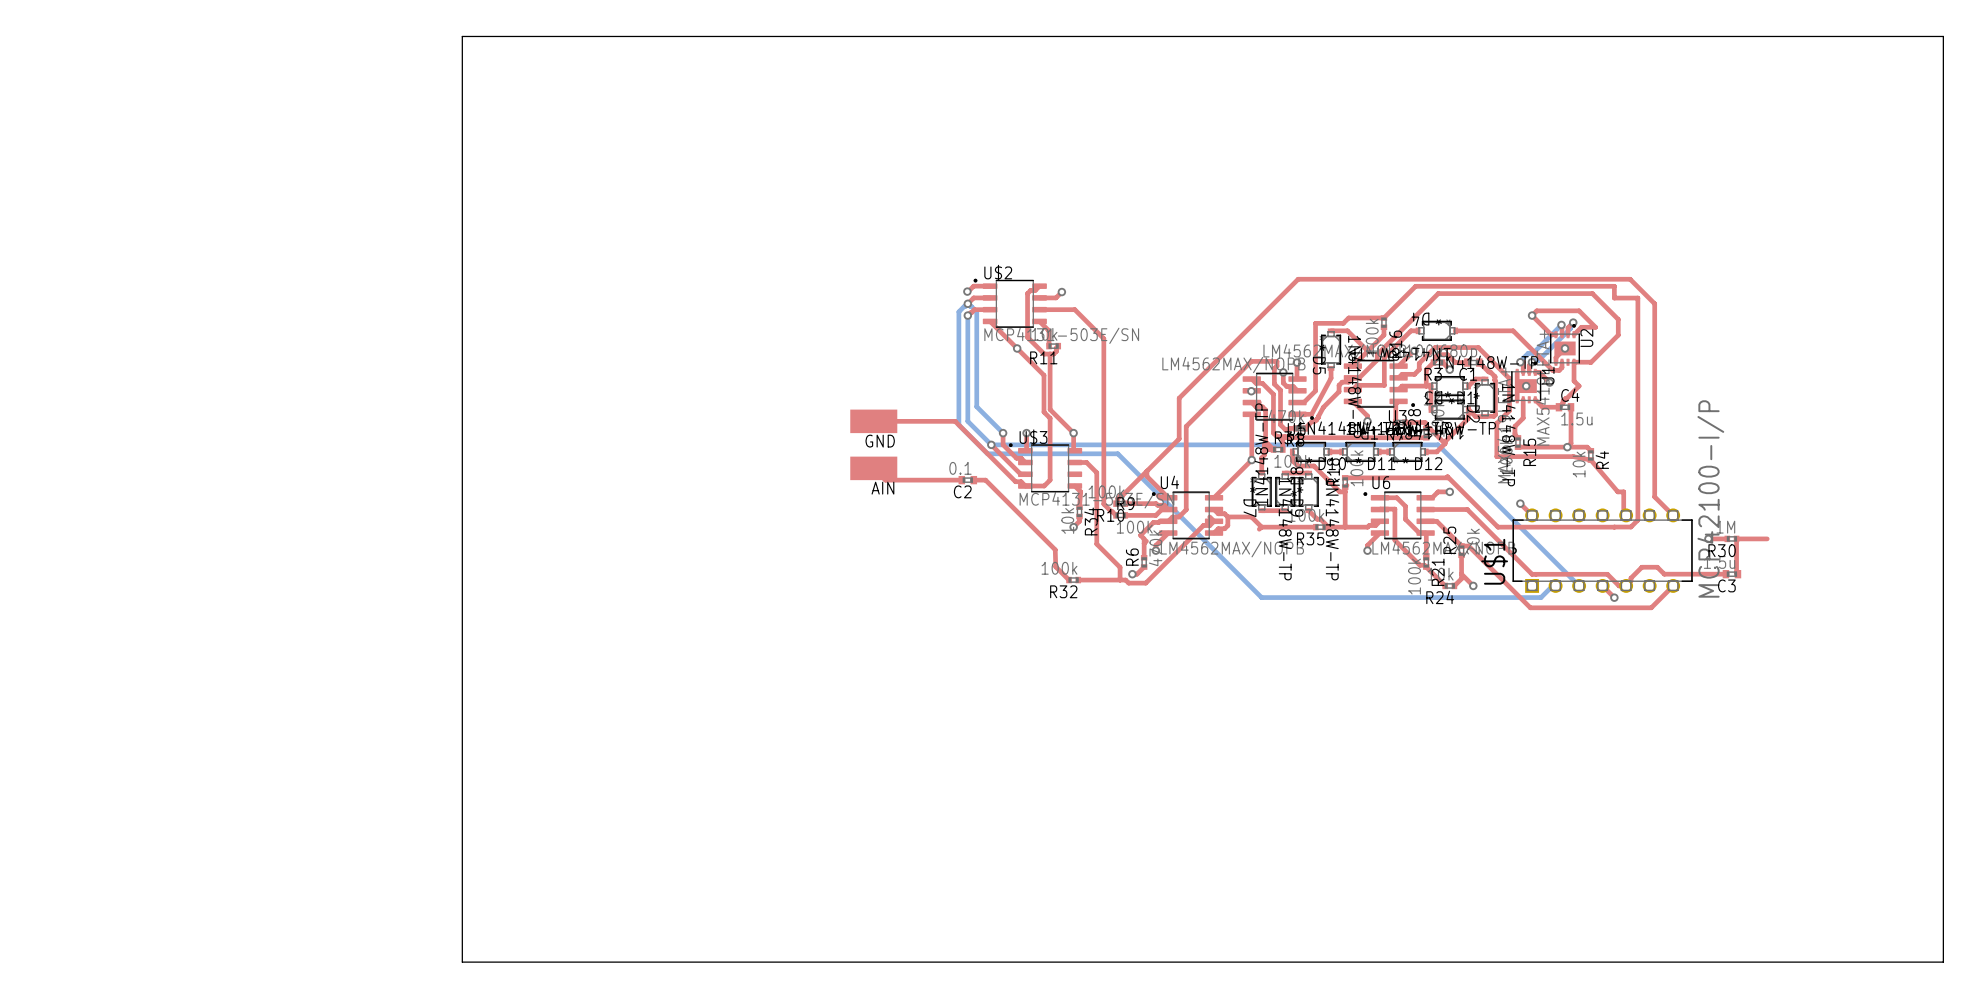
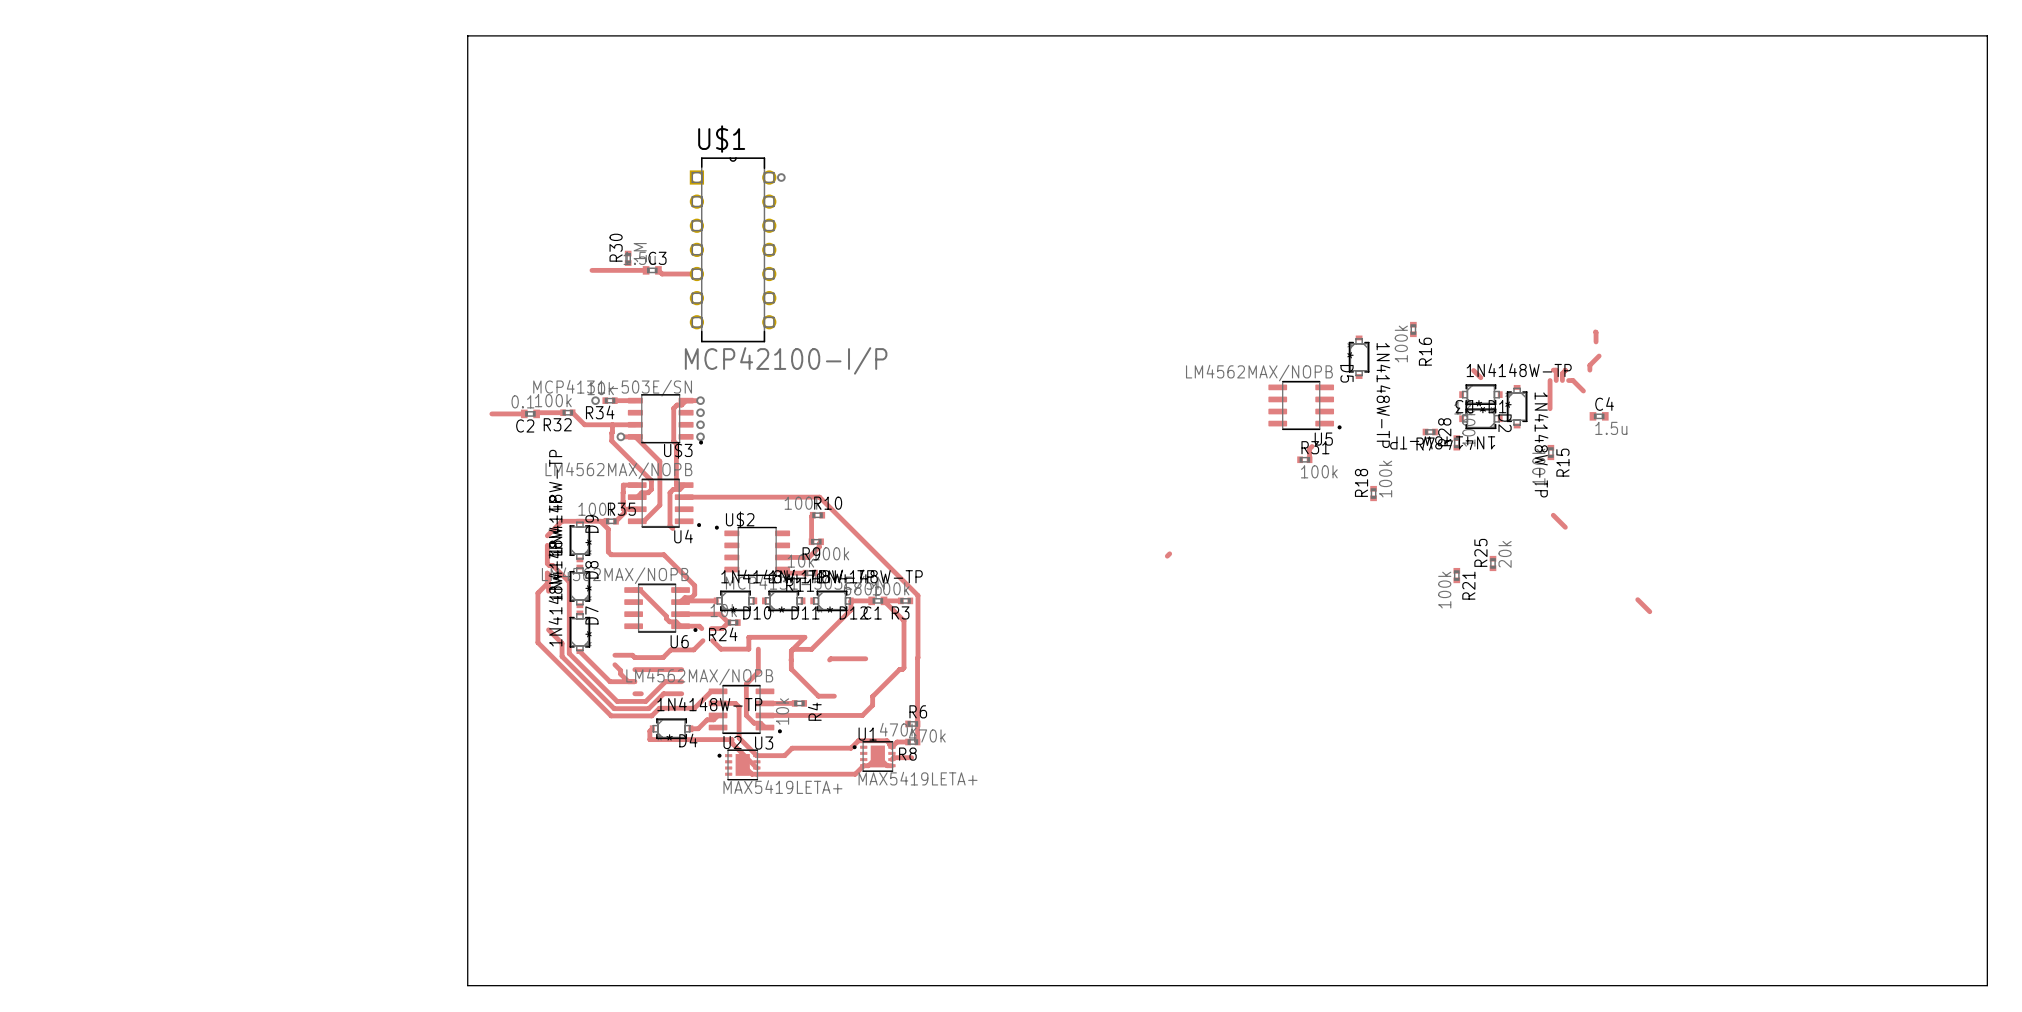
via: none -> (781, 177)
top track: none -> (591, 270) (646, 270)
top track: none -> (658, 270) (662, 274) (696, 274)
top track: (990, 286) (973, 286) (967, 291) -> none
top track: (1039, 286) (1027, 293) (1027, 337) (1044, 354) (1053, 354) (1058, 346) -> none
via: (967, 291) -> none
top track: (1061, 292) (1055, 297) (1039, 297) -> none
via: (1061, 292) -> none
top track: (990, 297) (973, 297) (967, 303) -> none
via: (967, 303) -> none
U$2 position: (1010, 303) -> (752, 550)
top track: (990, 309) (974, 309) (967, 315) -> none
top track: (1039, 309) (1074, 309) (1103, 338) (1103, 504) (1116, 515) -> none
bottom track: (967, 315) (967, 421) (991, 444) (1438, 444) (1579, 585) -> none
via: (967, 315) -> none
via: (1532, 315) -> none
top track: (990, 321) (1043, 375) (1043, 412) (1050, 418) (1050, 480) (1044, 486) (1025, 486) (1021, 481) (1015, 481) (955, 421) (873, 421) -> none
top track: (1039, 321) (1049, 330) (1049, 346) -> none
top track: (1572, 322) (1568, 327) (1568, 334) -> none
bottom track: (1573, 322) (1570, 328) (1538, 360) (1531, 362) -> none
via: (1573, 322) -> none
bottom track: (1561, 324) (1533, 353) (1528, 353) (1520, 362) -> none
via: (1561, 324) -> none
top track: (1383, 327) (1383, 335) (1352, 366) -> none
top track: (1331, 330) (1347, 330) (1367, 351) -> none
top track: (1418, 330) (1411, 330) (1384, 357) (1384, 385) (1357, 385) (1352, 389) -> none
D4 rotation: 0° (1436, 330) -> 180° (671, 728)
D4 position: (1436, 330) -> (671, 728)
top track: (1455, 330) (1513, 330) (1552, 370) (1559, 370) (1562, 367) (1562, 362) -> none
top track: (1555, 334) (1551, 334) (1532, 315) (1536, 310) (1579, 310) (1595, 327) (1581, 327) (1574, 334) -> none
U2 rotation: 0° (1565, 344) -> 90° counterclockwise (739, 764)
U2 position: (1565, 344) -> (739, 764)
R11 position: (1053, 346) -> (810, 573)
via: (1017, 348) -> none
via: (1565, 348) -> none
top track: (1414, 350) (1398, 366) -> none
via: (1414, 350) -> none
top track: (1050, 354) (1050, 409) (1073, 433) (1074, 450) -> none
top track: (1296, 362) (1297, 379) -> none
via: (1296, 362) -> none
R3 position: (1438, 362) -> (905, 600)
top track: (1467, 362) (1455, 362) (1447, 354) (1437, 354) (1435, 360) (1426, 369) (1426, 386) -> none
C1 position: (1473, 362) -> (877, 600)
top track: (1479, 362) (1495, 377) -> none
via: (1520, 362) -> none
via: (1531, 362) -> none
top track: (1331, 368) (1331, 378) (1311, 414) (1297, 414) -> none
via: (1449, 369) -> none
top track: (1283, 372) (1283, 382) (1286, 386) (1293, 386) (1297, 390) -> none
via: (1283, 372) -> none
top track: (1494, 376) (1495, 414) (1475, 416) (1468, 409) (1468, 418) (1445, 443) -> none
top track: (1398, 377) (1402, 374) (1414, 374) (1419, 369) (1419, 363) (1435, 347) (1478, 347) (1509, 378) (1509, 410) (1496, 423) (1496, 456) (1573, 456) (1590, 460) (1617, 491) (1623, 491) (1623, 512) (1626, 515) -> none
top track: (1251, 379) (1256, 383) (1262, 383) (1273, 394) (1273, 433) (1276, 436) (1426, 437) -> none
top track: (1485, 379) (1475, 379) (1468, 386) -> none
U1 rotation: 0° (1526, 382) -> 90° counterclockwise (874, 756)
U1 position: (1526, 382) -> (874, 756)
via: (1549, 382) -> none
U3 position: (1379, 383) -> (745, 709)
via: (1526, 386) -> none
top track: (1398, 389) (1402, 386) (1430, 386) (1430, 409) -> none
via: none -> (595, 400)
top track: none -> (614, 400) (635, 400)
top track: none -> (700, 400) (686, 400) (673, 408) (676, 485) (684, 485) (679, 489) (673, 489) (669, 492) (669, 525) (672, 528)
via: none -> (700, 400)
via: (1251, 391) -> none
top track: (1523, 399) (1523, 418) (1514, 426) (1514, 434) (1517, 437) -> none
top track: (1535, 399) (1542, 407) (1558, 407) (1579, 386) (1574, 381) (1574, 362) (1590, 362) (1618, 335) (1618, 319) (1592, 293) (1438, 293) (1377, 354) (1377, 359) (1359, 377) (1352, 377) (1348, 382) (1342, 382) (1339, 385) (1339, 391) (1323, 407) (1316, 420) (1311, 421) (1305, 428) -> none
top track: (1352, 401) (1367, 416) (1367, 421) -> none
top track: (1398, 401) (1395, 404) (1395, 422) -> none
top track: (1259, 402) (1251, 402) (1256, 406) (1262, 406) (1265, 409) (1265, 441) (1273, 449) (1269, 449) (1264, 444) (1261, 473) -> none
top track: (1297, 402) (1303, 402) (1315, 390) (1315, 323) (1343, 323) (1348, 317) (1383, 317) (1415, 286) (1614, 286) (1614, 298) (1637, 298) (1637, 520) (1630, 527) (1614, 527) -> none
top track: none -> (563, 412) (536, 413)
top track: none -> (572, 412) (584, 424) (635, 424)
via: none -> (700, 412)
top track: none -> (491, 413) (524, 413)
top track: (1571, 407) (1571, 443) (1567, 447) -> none
top track: (1251, 414) (1251, 460) (1214, 497) -> none
top track: none -> (612, 424) (611, 440) (651, 480) (651, 489) (648, 492) (641, 492) (637, 497)
via: none -> (700, 424)
GND: (873, 421) -> none
via: (1367, 421) -> none
top track: (1405, 422) (1425, 422) (1426, 428) (1429, 428) (1445, 443) -> none
top track: none -> (620, 436) (635, 436) (659, 461) (659, 505) (643, 521) (637, 521)
via: none -> (620, 436)
via: none -> (700, 436)
top track: (1295, 428) (1285, 429) (1280, 424) (1280, 390) (1274, 384) (1274, 368) (1276, 366) (1276, 361) (1251, 361) (1186, 426) (1186, 509) (1178, 517) (1172, 517) (1168, 521) (1153, 522) (1140, 535) (1144, 538) (1144, 557) -> none
R8 position: (1300, 428) -> (912, 742)
top track: (1003, 433) (1003, 444) (1016, 458) (1021, 458) (1025, 462) -> none
bottom track: (1003, 433) (976, 406) (976, 311) (967, 303) (958, 311) (958, 425) (987, 453) (1117, 453) (1261, 597) (1540, 597) (1552, 585) (1555, 585) -> none
via: (1003, 433) -> none
top track: (1026, 433) (1025, 450) -> none
via: (1026, 433) -> none
via: (1073, 433) -> none
top track: (1445, 443) (1436, 451) (1426, 451) -> none
top track: (991, 444) (1020, 474) (1025, 474) -> none
via: (991, 444) -> none
top track: (1517, 447) (1587, 447) (1590, 450) -> none
via: (1567, 447) -> none
top track: (1292, 451) (1292, 460) (1297, 466) (1313, 466) (1339, 491) (1345, 491) -> none
D10 position: (1311, 451) -> (735, 600)
top track: (1329, 451) (1341, 451) -> none
D11 position: (1360, 451) -> (783, 600)
top track: (1379, 451) (1388, 451) -> none
D12 position: (1407, 451) -> (831, 600)
R4 rotation: 0° (1590, 455) -> 90° clockwise (799, 703)
R4 position: (1590, 455) -> (799, 703)
via: (1251, 460) -> none
top track: (1074, 462) (1086, 462) (1096, 472) (1096, 544) (1120, 567) (1120, 580) -> none
U$3 rotation: 0° (1045, 467) -> 180° (665, 419)
U$3 position: (1045, 467) -> (665, 419)
top track: (873, 468) (885, 480) (961, 480) -> none
AIN: (873, 468) -> none
top track: (1146, 471) (1146, 476) (1168, 497) (1160, 497) (1158, 495) -> none
top track: (1285, 473) (1308, 473) -> none
top track: none -> (637, 485) (623, 485) (623, 492) (623, 509) (637, 509)
top track: (1345, 477) (1447, 476) (1498, 527) (1614, 527) -> none
C2 position: (967, 480) -> (530, 413)
top track: (973, 480) (985, 480) (1055, 549) (1055, 566) (1068, 580) -> none
top track: (1346, 485) (1345, 487) (1345, 527) -> none
top track: none -> (684, 497) (819, 497) (917, 595) (917, 742)
top track: (1074, 486) (1080, 491) (1079, 507) -> none
D7 rotation: 0° (1261, 491) -> 180° (579, 632)
D7 position: (1261, 491) -> (579, 632)
D8 position: (1285, 491) -> (579, 586)
D9 rotation: 0° (1308, 491) -> 180° (579, 540)
D9 position: (1308, 491) -> (579, 540)
top track: (1449, 491) (1438, 491) (1432, 497) (1425, 497) -> none
via: (1449, 491) -> none
top track: none -> (624, 509) (624, 512) (616, 521)
top track: (1379, 497) (1396, 497) (1405, 506) (1405, 519) (1419, 533) (1426, 533) (1426, 557) -> none
top track: none -> (812, 515) (811, 541)
top track: (1116, 503) (1117, 498) (1179, 438) (1179, 398) (1298, 279) (1630, 279) (1654, 303) (1654, 496) (1673, 515) -> none
R10 position: (1120, 503) -> (817, 515)
top track: (1125, 503) (1156, 503) (1164, 505) (1168, 509) -> none
R9 name position: R9 (1125, 503) -> R9 (811, 553)
via: (1520, 503) -> none
top track: (1165, 506) (1155, 515) (1125, 515) -> none
top track: none -> (600, 521) (608, 529) (608, 551) (611, 554) (663, 554) (694, 585) (694, 594) (691, 597) (684, 597) (680, 602)
top track: none -> (606, 521) (561, 521) (547, 535)
top track: (1214, 509) (1218, 513) (1224, 513) (1227, 516) -> none
top track: (1379, 509) (1394, 509) (1394, 540) (1419, 565) (1424, 565) (1445, 585) -> none
top track: (1425, 509) (1467, 509) (1532, 574) (1607, 574) (1619, 585) (1626, 585) (1641, 567) (1657, 567) (1664, 574) (1725, 574) -> none
top track: (1261, 510) (1285, 510) -> none
top track: (1308, 510) (1328, 527) -> none
R34 rotation: 0° (1079, 511) -> 90° clockwise (610, 400)
R34 position: (1079, 511) -> (610, 400)
R10 name position: R10 (1110, 515) -> R10 (828, 503)
R9 position: (1120, 515) -> (816, 541)
U4 rotation: 0° (1187, 515) -> 180° (664, 503)
U4 position: (1187, 515) -> (664, 503)
U6 rotation: 0° (1399, 515) -> 180° (660, 608)
U6 position: (1399, 515) -> (660, 608)
top track: (1079, 516) (1079, 521) (1073, 527) -> none
top track: (1227, 516) (1251, 516) (1261, 527) -> none
top track: (1227, 516) (1227, 525) (1224, 528) (1218, 528) (1214, 533) -> none
top track: (1209, 517) (1214, 521) (1209, 525) (1203, 525) (1145, 583) (1128, 583) (1125, 580) (1078, 580) -> none
top track: (1379, 521) (1375, 525) (1367, 527) (1325, 527) -> none
top track: (1425, 521) (1436, 521) (1461, 546) (1468, 546) (1530, 607) (1651, 607) (1673, 585) -> none
via: (1073, 527) -> none
top track: (1315, 527) (1261, 527) (1259, 529) -> none
R35 position: (1320, 527) -> (611, 521)
top track: none -> (821, 541) (819, 547) (808, 557) (782, 557)
top track: none -> (547, 545) (547, 563) (552, 565) (569, 582) (569, 653) (617, 701) (645, 701) (665, 681) (681, 681)
top track: (1168, 533) (1155, 545) (1155, 550) -> none
top track: (1379, 533) (1367, 545) (1367, 550) -> none
R35 name position: R35 (1310, 538) -> R35 (621, 509)
top track: (1708, 538) (1727, 538) -> none
via: (1708, 538) -> none
R30 rotation: 0° (1731, 538) -> 90° clockwise (628, 258)
R30 position: (1731, 538) -> (628, 258)
top track: (1767, 538) (1736, 538) (1737, 574) -> none
via: (1155, 550) -> none
via: (1367, 550) -> none
U$1 rotation: 0° (1602, 550) -> 90° clockwise (733, 249)
U$1 position: (1602, 550) -> (733, 249)
top track: (1461, 555) (1461, 578) (1454, 585) -> none
top track: none -> (782, 569) (786, 573) (805, 573)
R6 rotation: 0° (1144, 562) -> 90° clockwise (912, 723)
R6 position: (1144, 562) -> (912, 723)
top track: (1144, 567) (1137, 574) (1132, 574) -> none
via: (1132, 574) -> none
top track: (1461, 574) (1473, 585) -> none
C3 position: (1731, 574) -> (652, 270)
top track: none -> (633, 590) (640, 590) (669, 621) (676, 621) (680, 626) (699, 626) (701, 628)
top track: none -> (548, 591) (547, 573) (547, 583) (537, 593) (537, 642) (611, 715) (651, 715) (659, 708) (694, 708) (711, 691) (718, 691)
R32 position: (1073, 580) -> (567, 412)
R24 position: (1449, 585) -> (733, 622)
via: (1473, 585) -> none
C3 name position: C3 (1726, 585) -> C3 (657, 258)
top track: none -> (681, 600) (716, 600)
top track: none -> (871, 600) (851, 600) (850, 610) (811, 649) (792, 649)
top track: none -> (900, 600) (884, 600) (904, 620) (904, 667) (899, 669) (872, 696) (872, 705) (862, 715) (764, 715)
via: (1614, 597) -> none
top track: none -> (680, 614) (719, 614) (728, 622) (722, 628) (711, 628)
top track: none -> (548, 629) (562, 643) (562, 656) (614, 708) (648, 708) (663, 693) (681, 693)
top track: none -> (703, 640) (693, 649) (670, 649) (663, 657) (614, 655)
top track: none -> (712, 640) (720, 649) (748, 649) (748, 637) (804, 637) (791, 650) (791, 669) (818, 696) (834, 696)
top track: none -> (758, 649) (758, 672) (746, 684) (746, 715) (754, 723) (760, 723) (764, 727)
top track: none -> (579, 651) (610, 681) (634, 681)
top track: none -> (865, 658) (829, 659)
top track: none -> (614, 664) (628, 681)
top track: none -> (634, 669) (681, 669)
top track: none -> (634, 693) (641, 693)
top track: none -> (718, 703) (735, 703) (739, 707) (739, 737) (756, 755) (784, 755) (792, 748) (851, 748) (858, 740) (886, 740) (891, 747)
top track: none -> (764, 703) (794, 703)
top track: none -> (718, 715) (713, 719) (707, 719) (698, 728) (690, 728)
top track: none -> (652, 728) (649, 731) (649, 739) (731, 739) (731, 743) (756, 768)
top track: none -> (908, 742) (897, 742) (891, 747)
top track: none -> (911, 757) (893, 757) (891, 759)
top track: none -> (742, 764) (751, 774) (855, 774) (863, 765) (868, 765) (877, 756) (887, 765) (891, 765)

